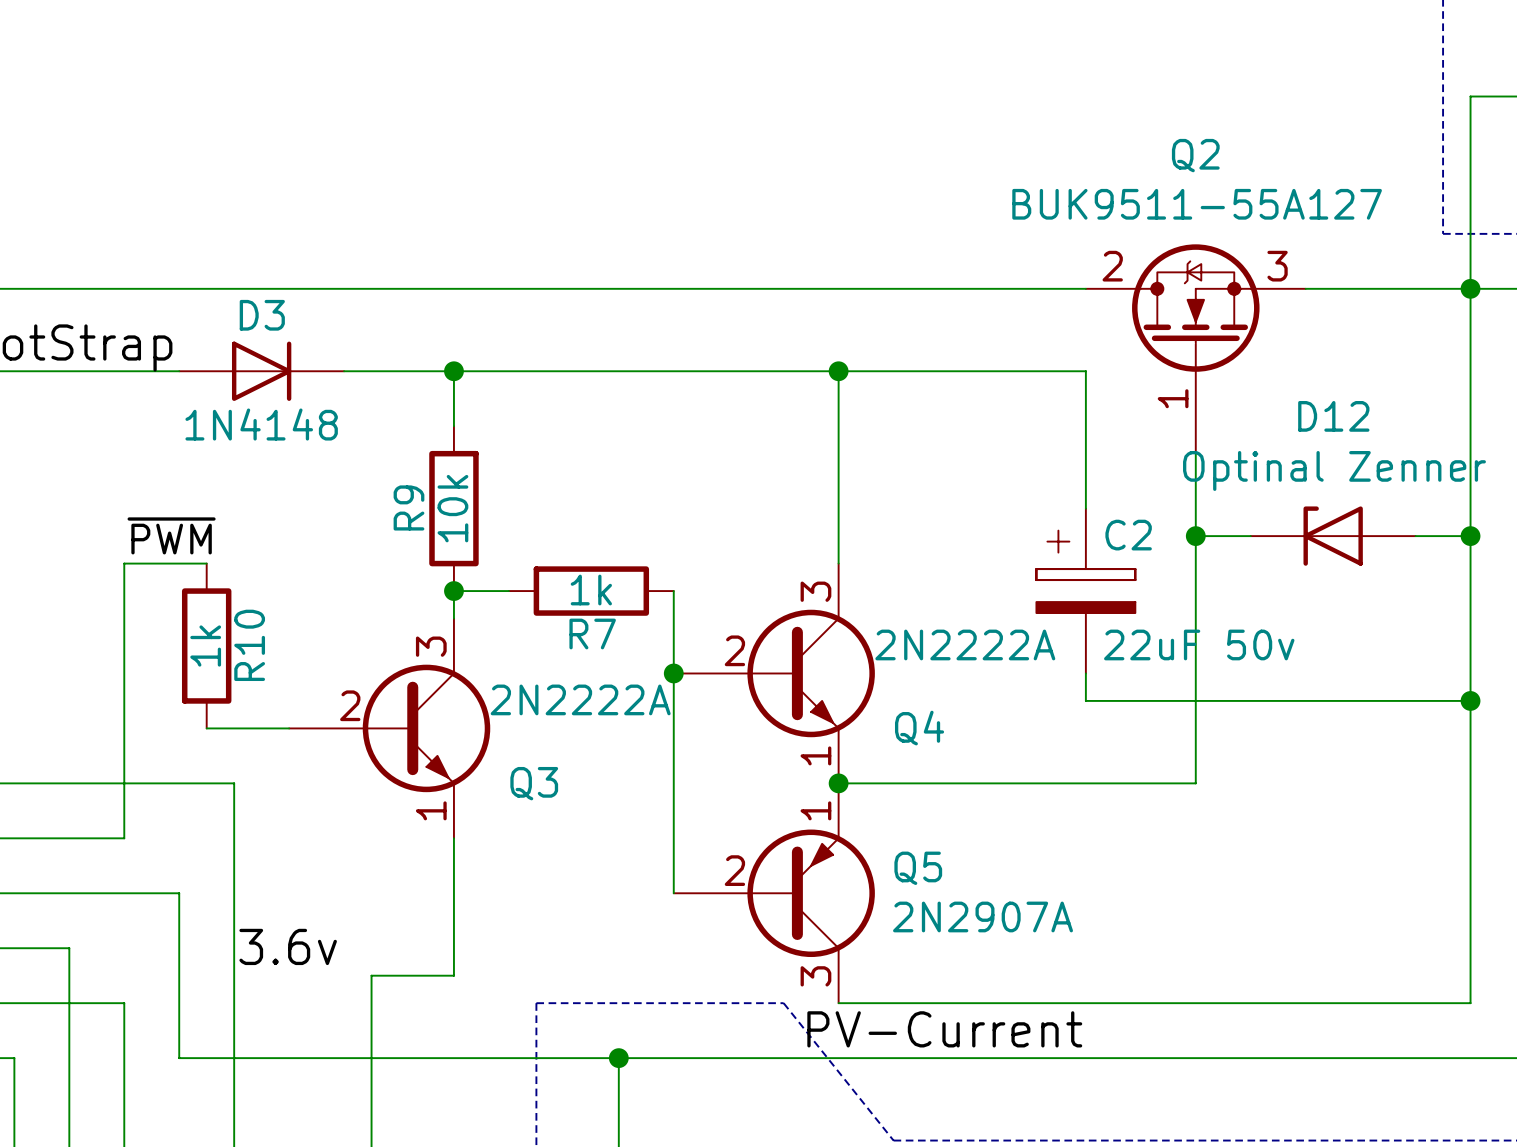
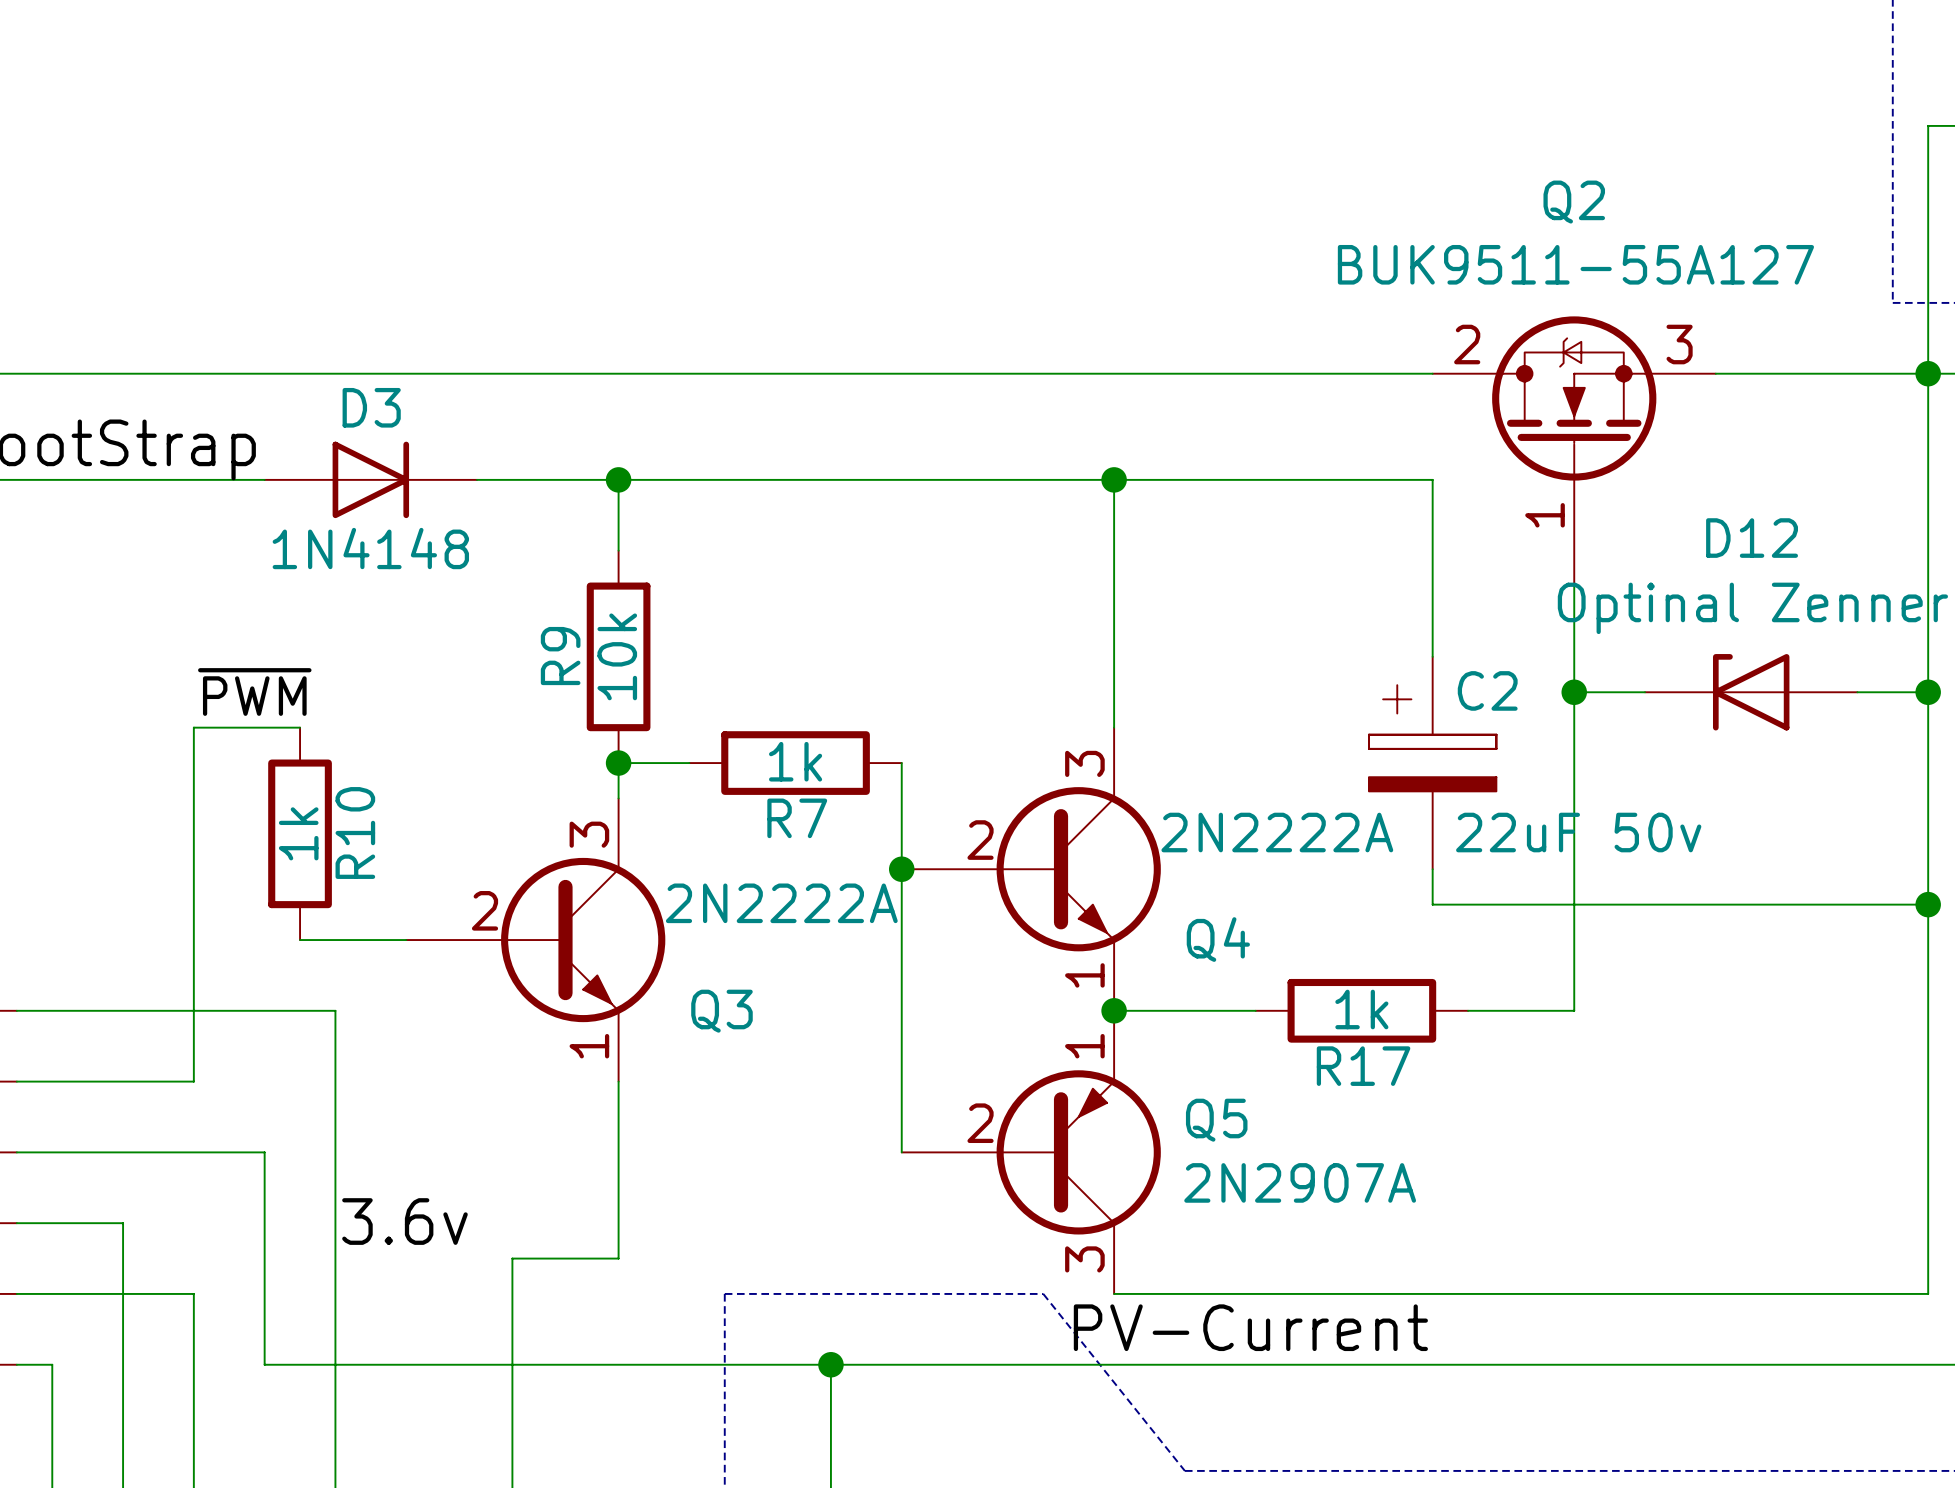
wire: (948, 783) (1113, 783) -> none
R17: none -> 1k (1361, 1010)

